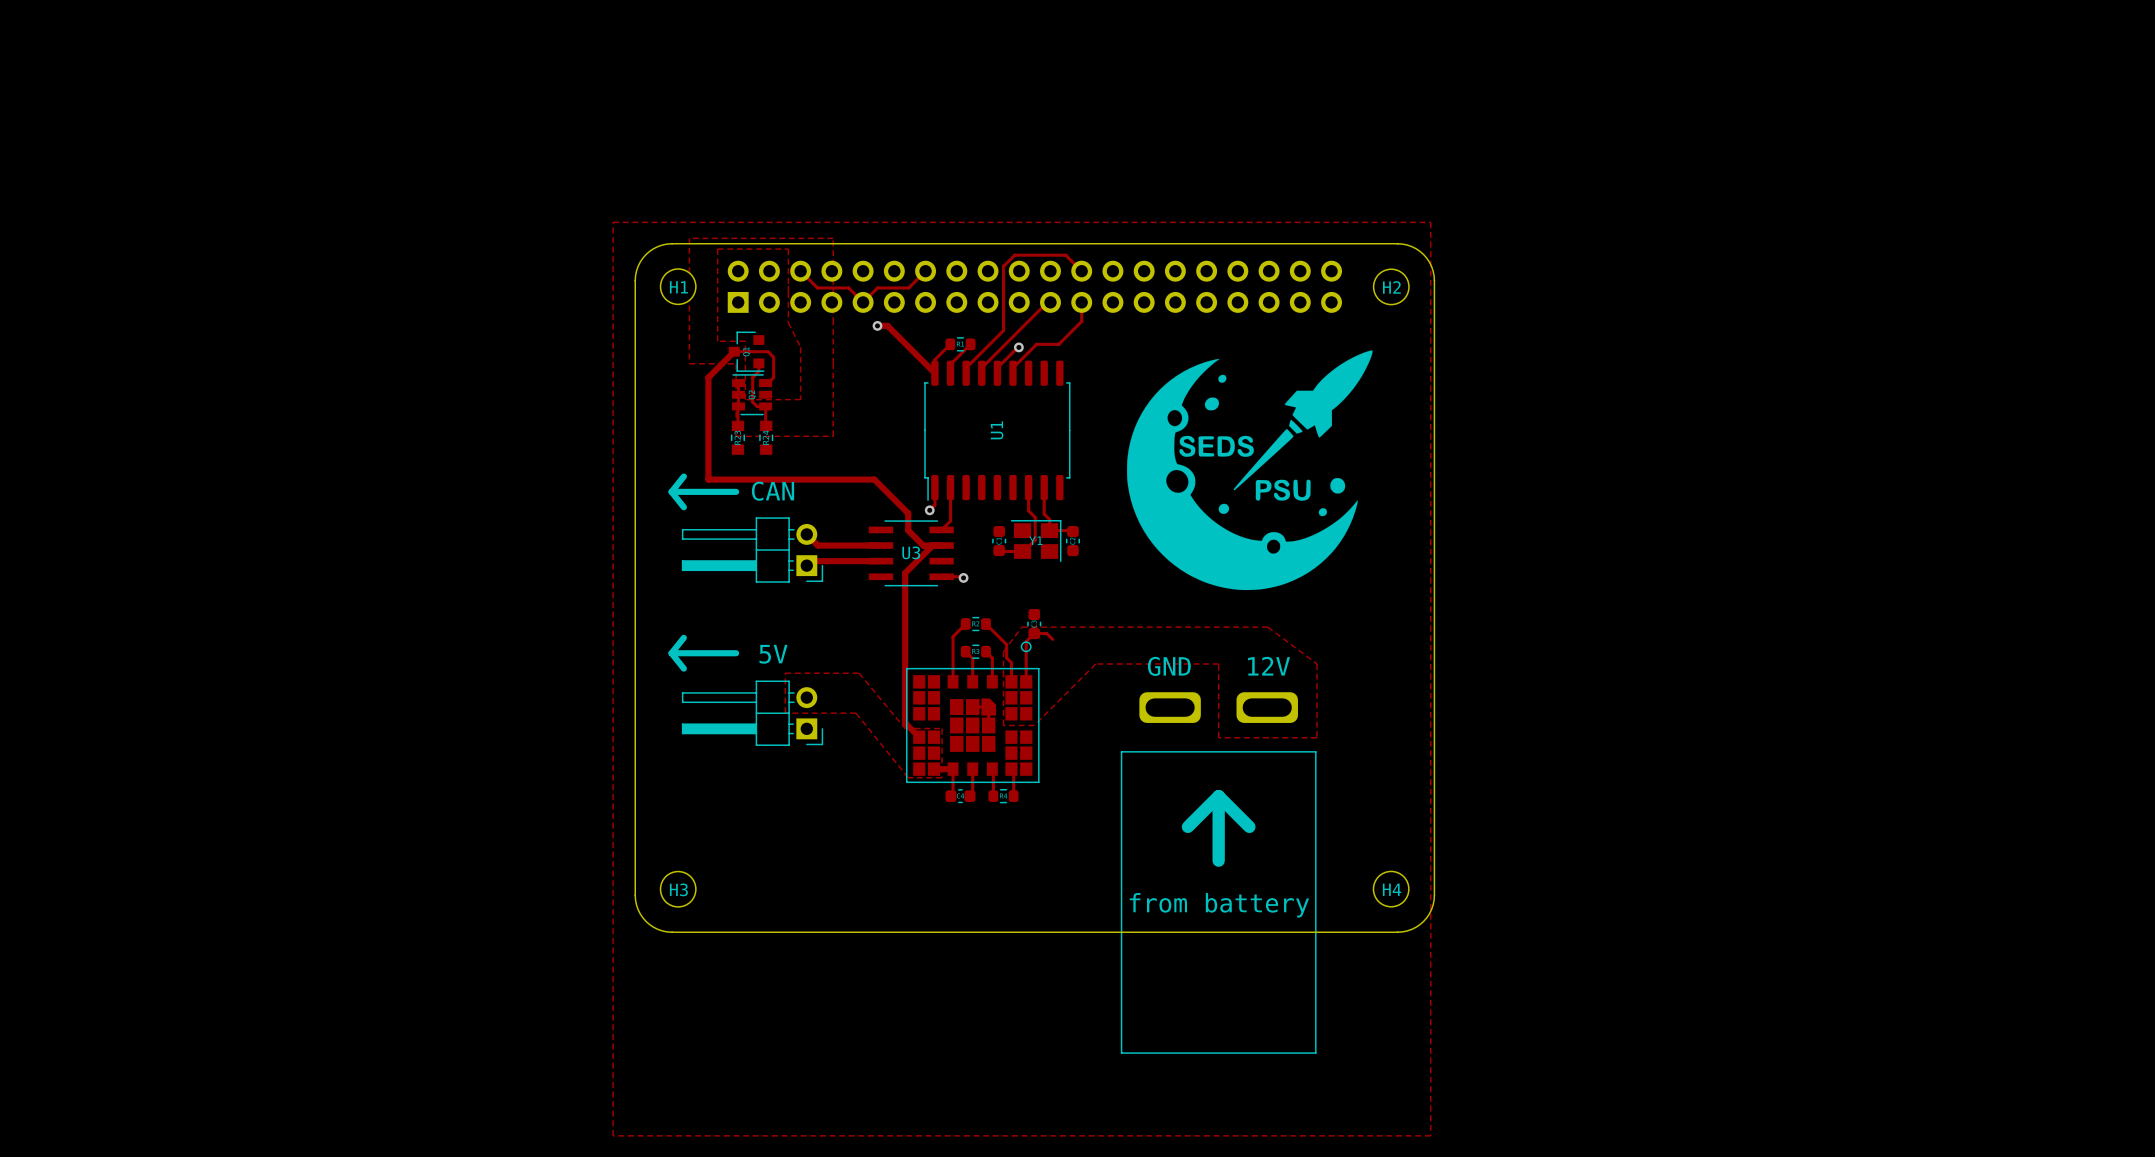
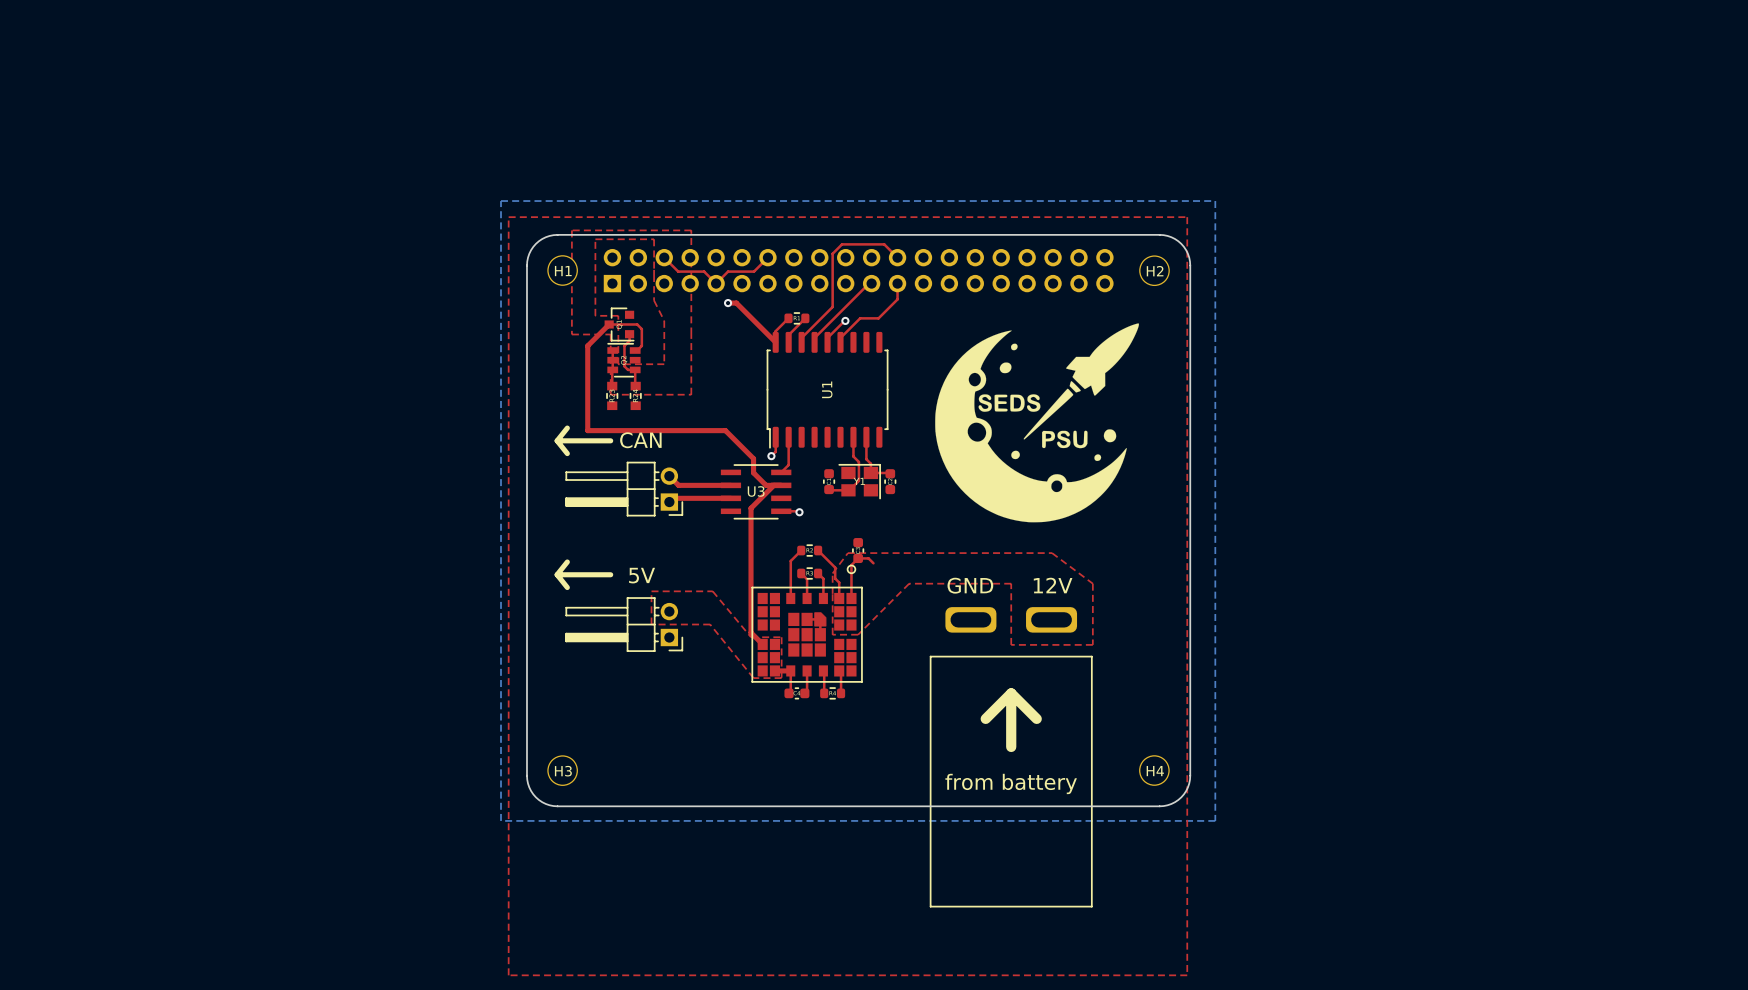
bottom zone outline: none -> (501, 201) (501, 820) (1215, 820) (1215, 201) (501, 201)

